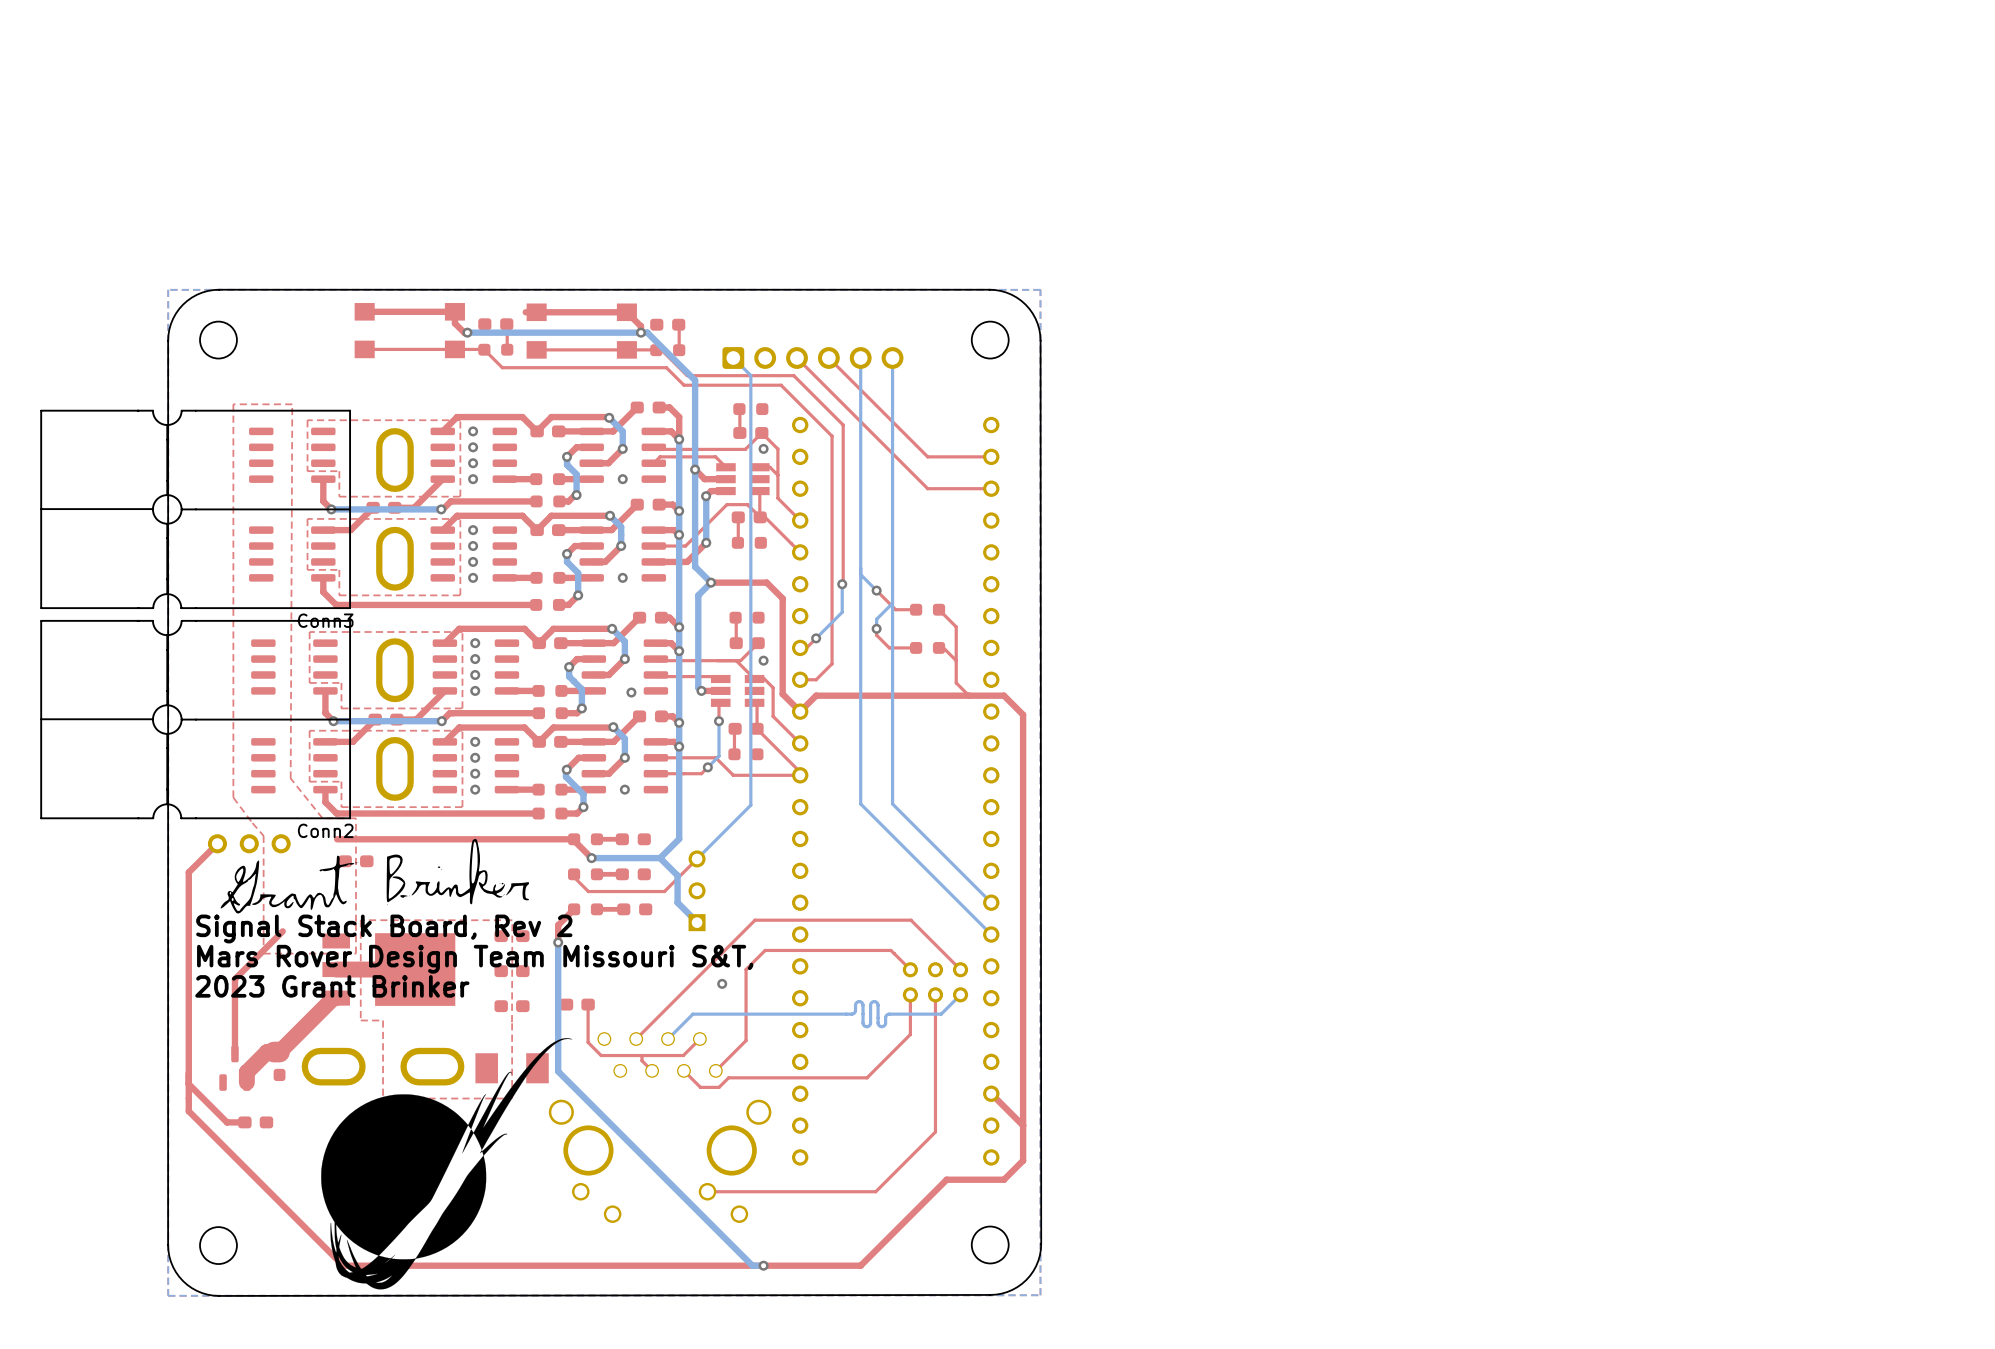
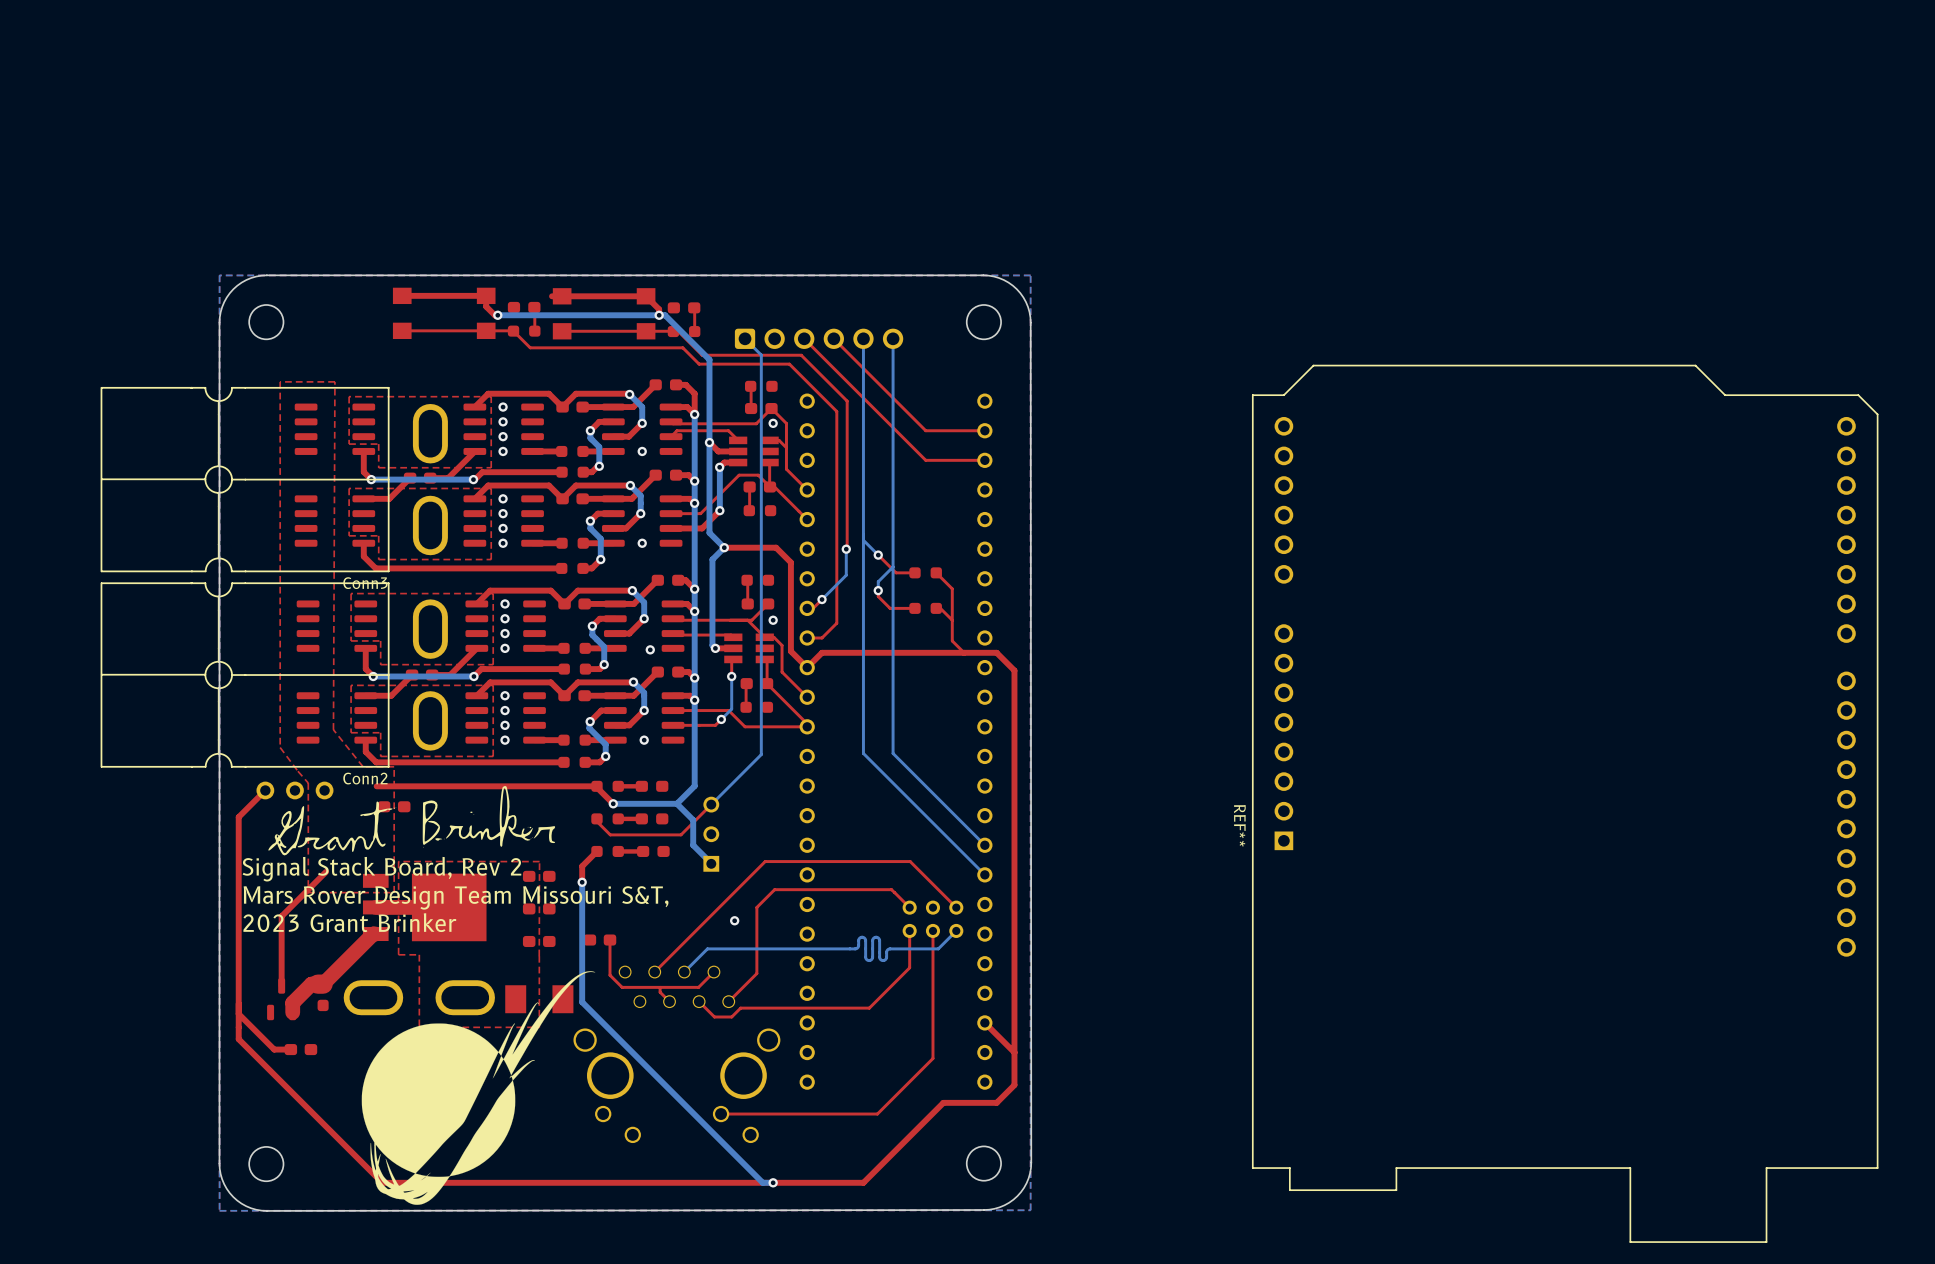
REF**: none -> (1565, 803)

